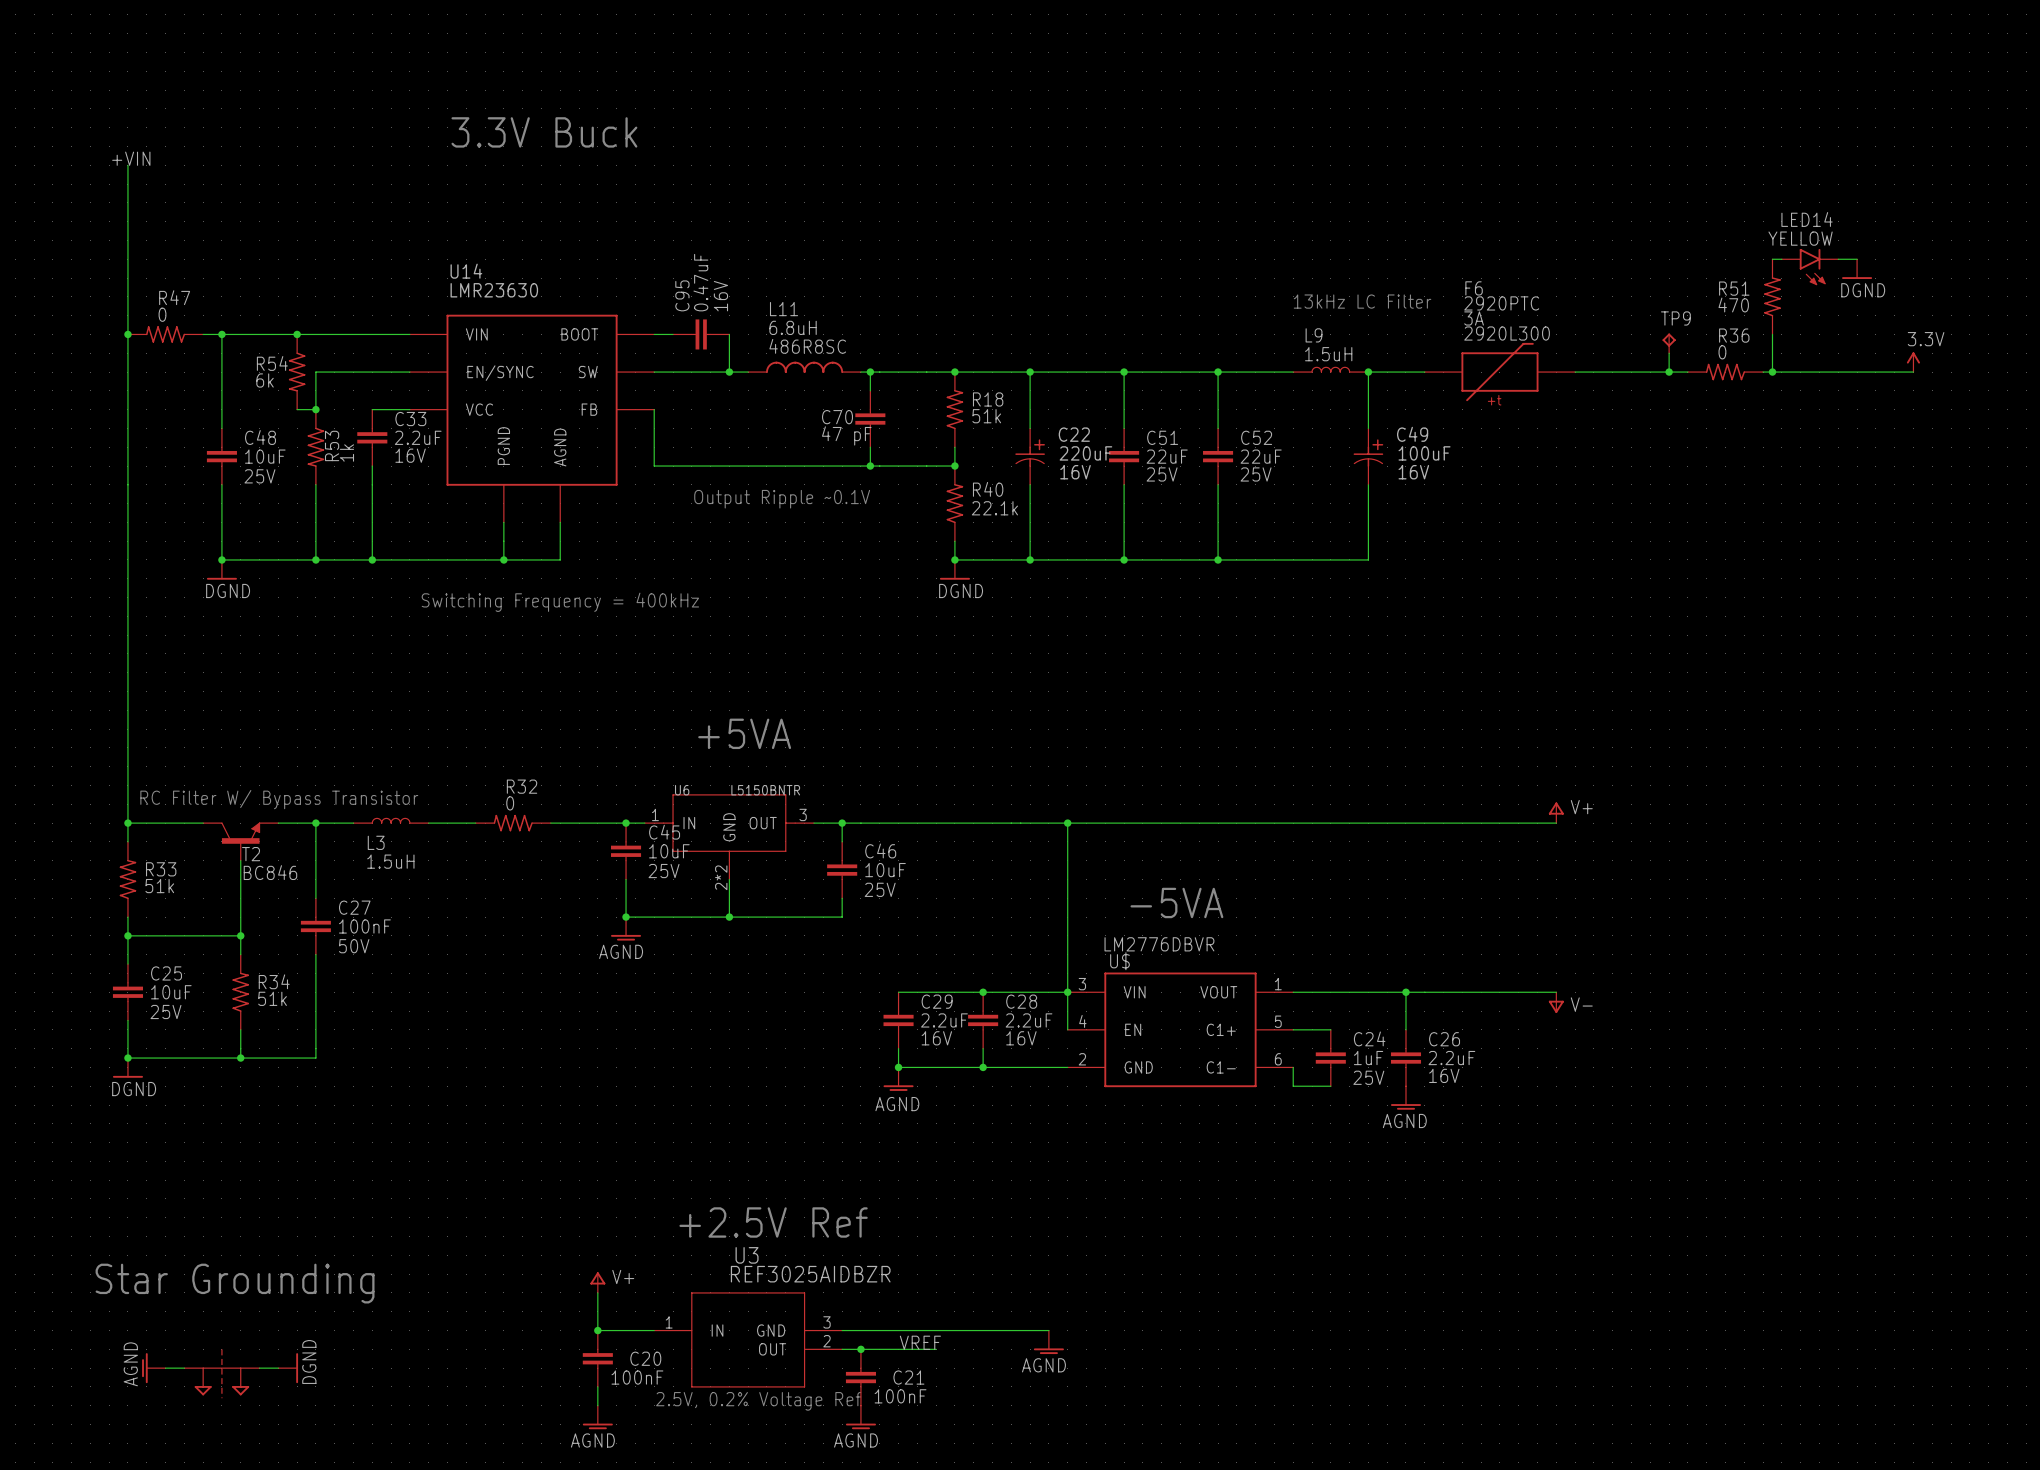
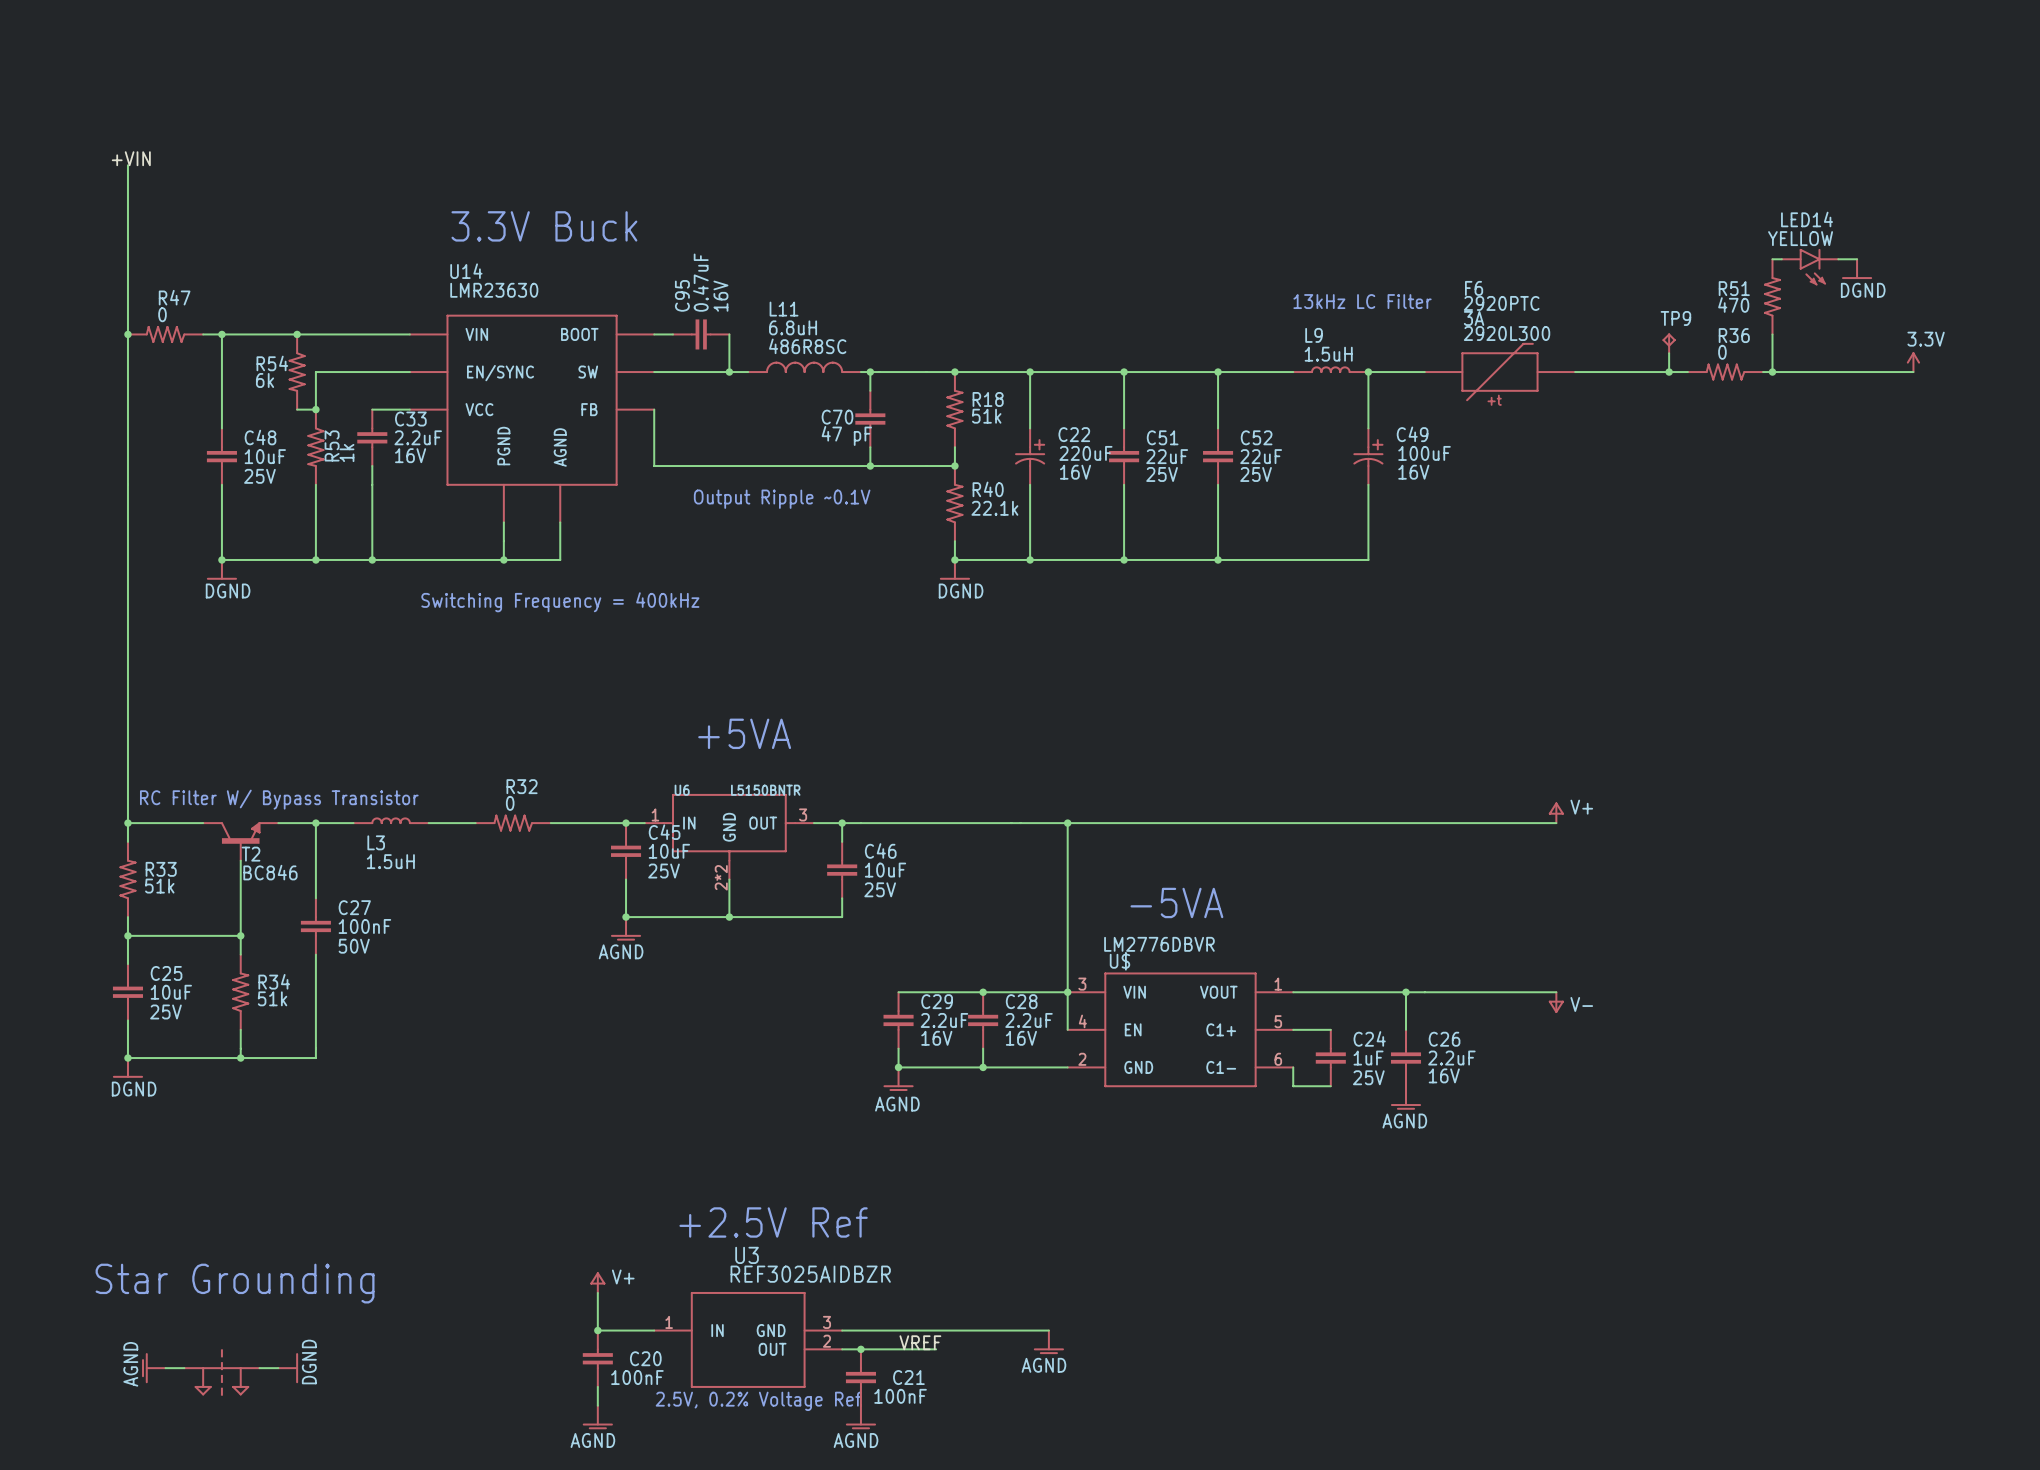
text position: 3.3V Buck (544, 132) -> 3.3V Buck (544, 226)

